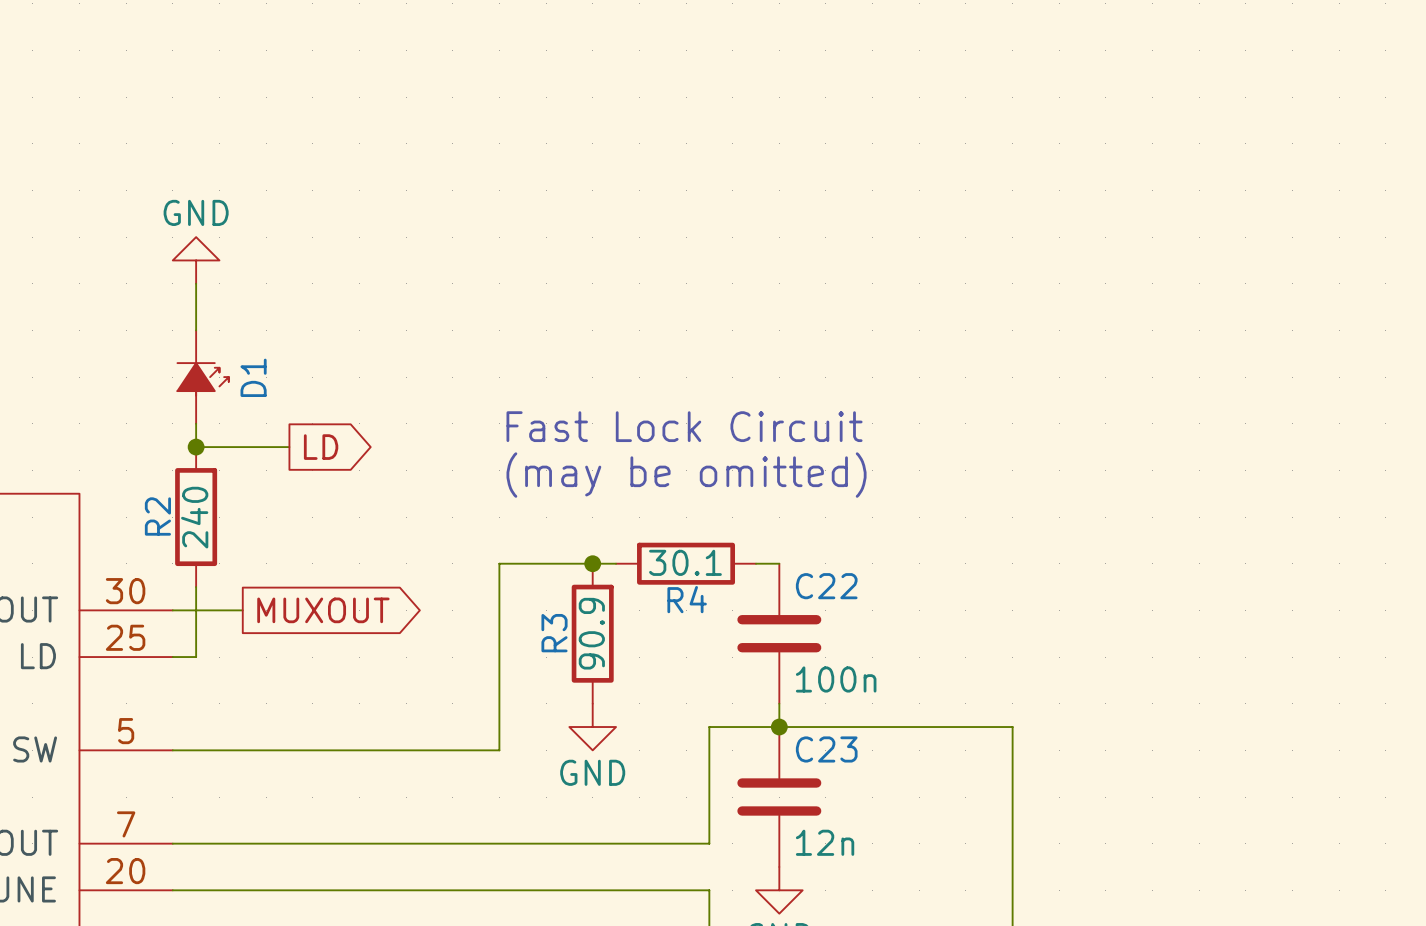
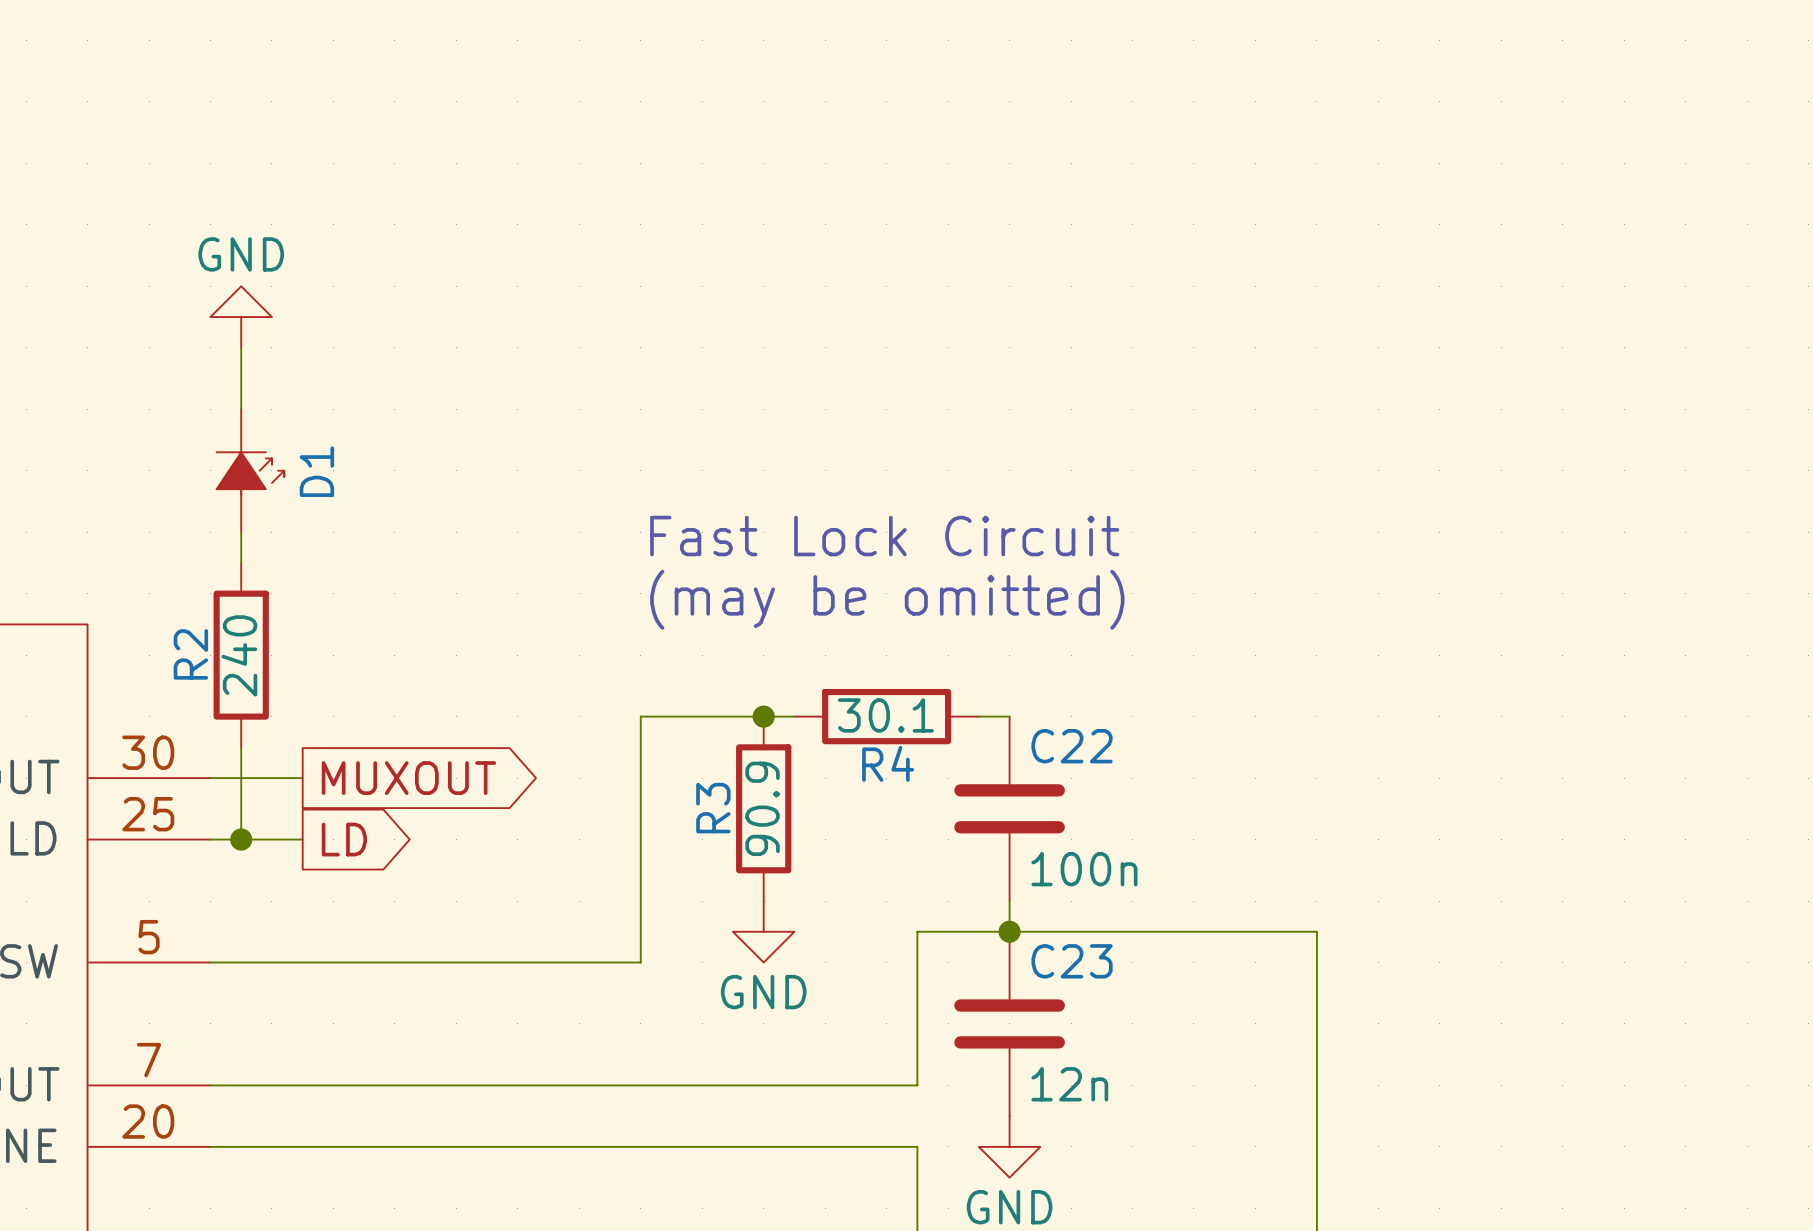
wire: (196, 447) (289, 447) -> none
junction: (196, 447) -> none
global label position: LD (321, 447) -> LD (344, 839)
wire: none -> (241, 839) (302, 839)
junction: none -> (241, 839)

